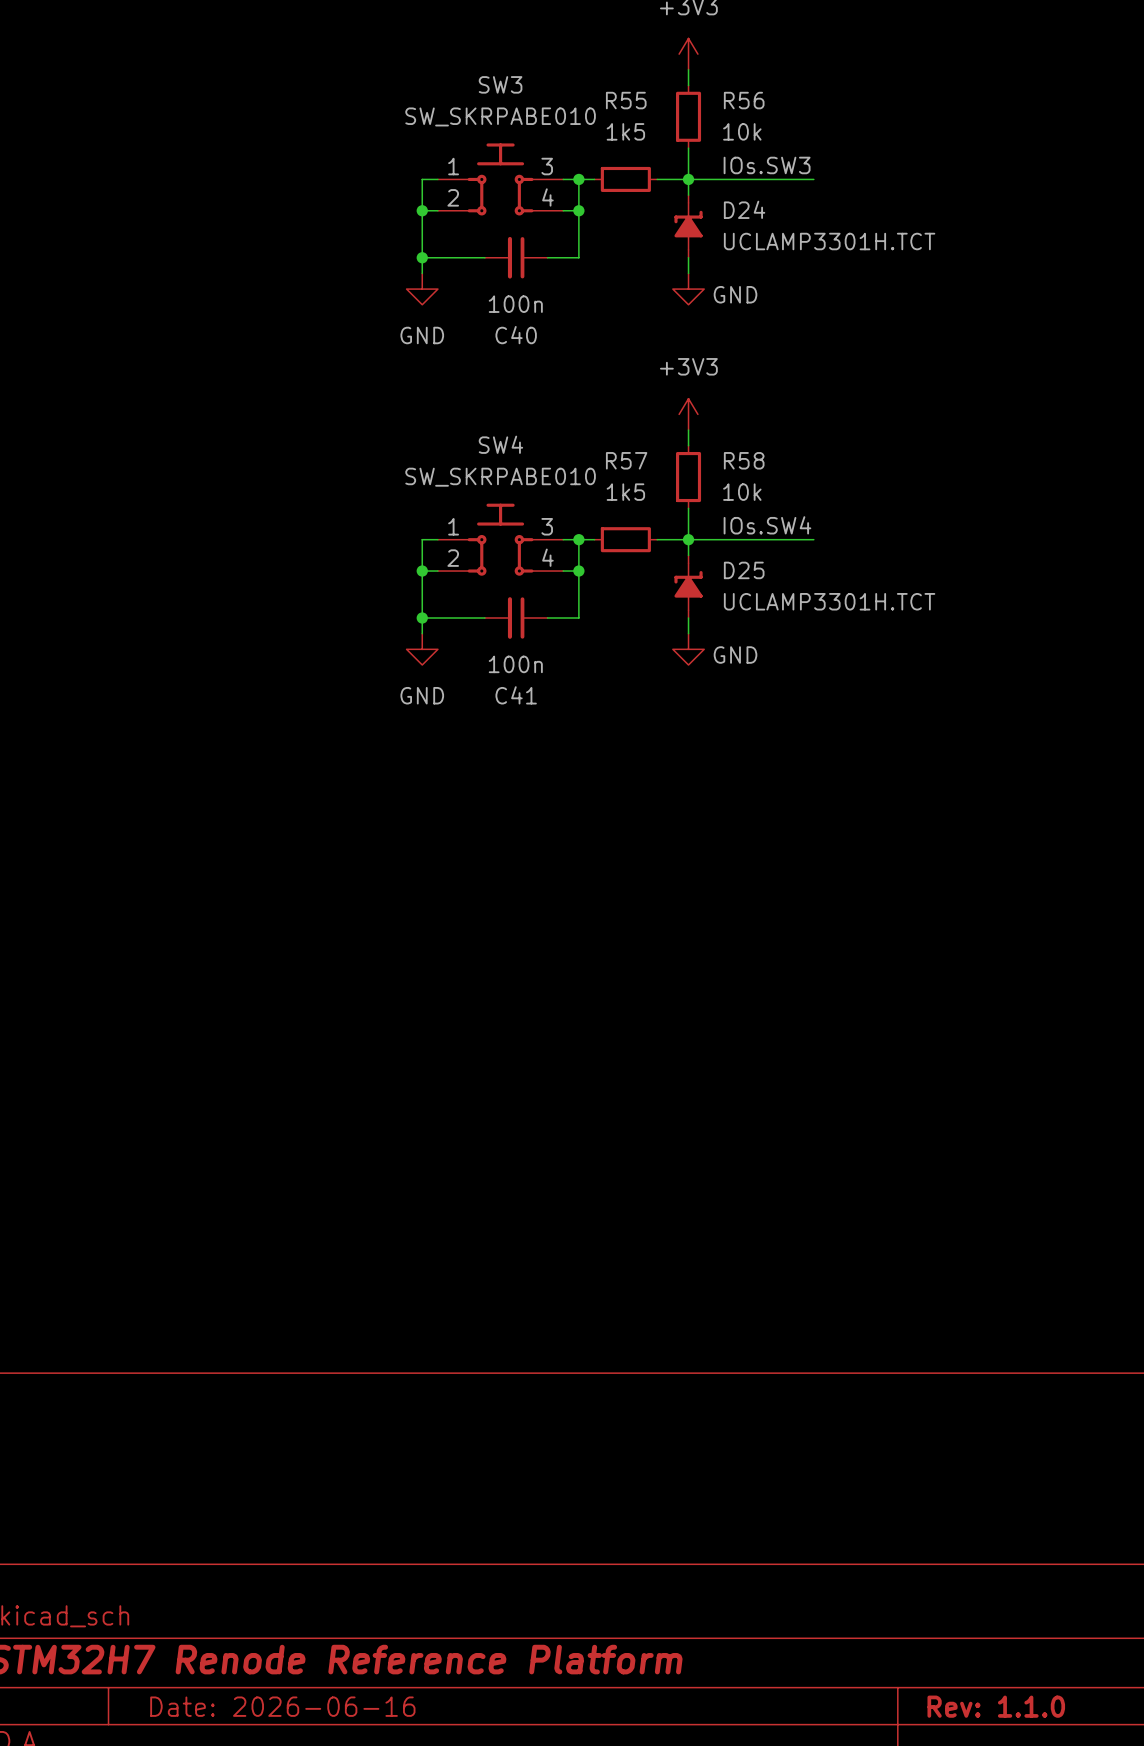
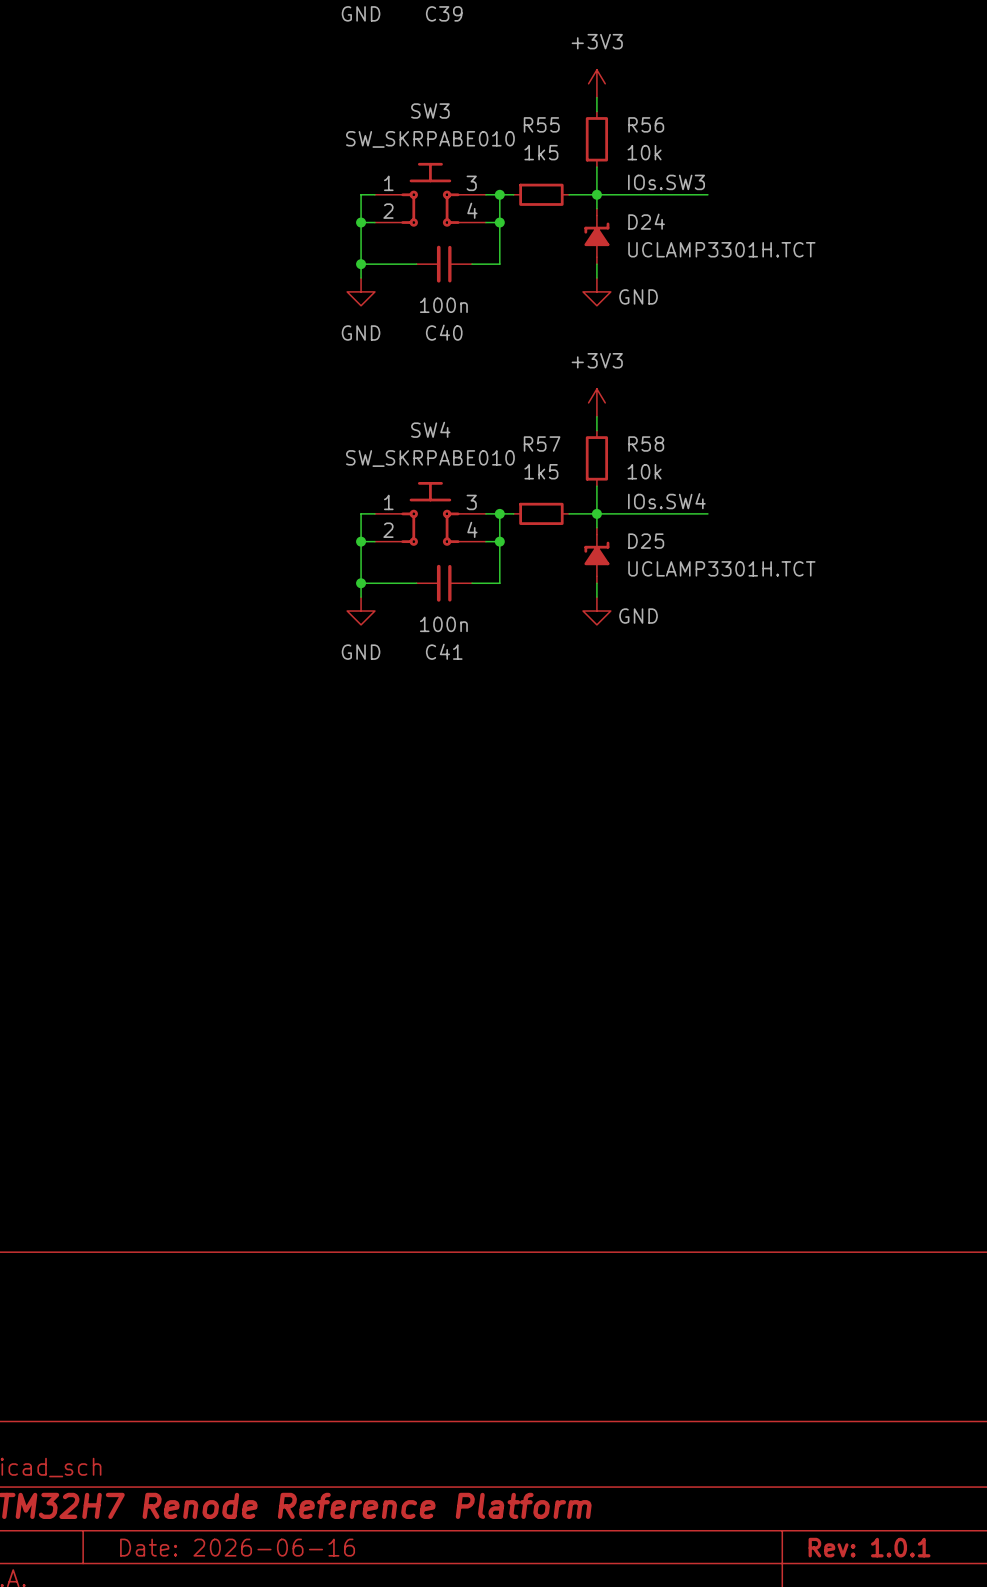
title block: Rev: 1.1.0 (996, 1706) -> Rev: 1.0.1 (869, 1547)

